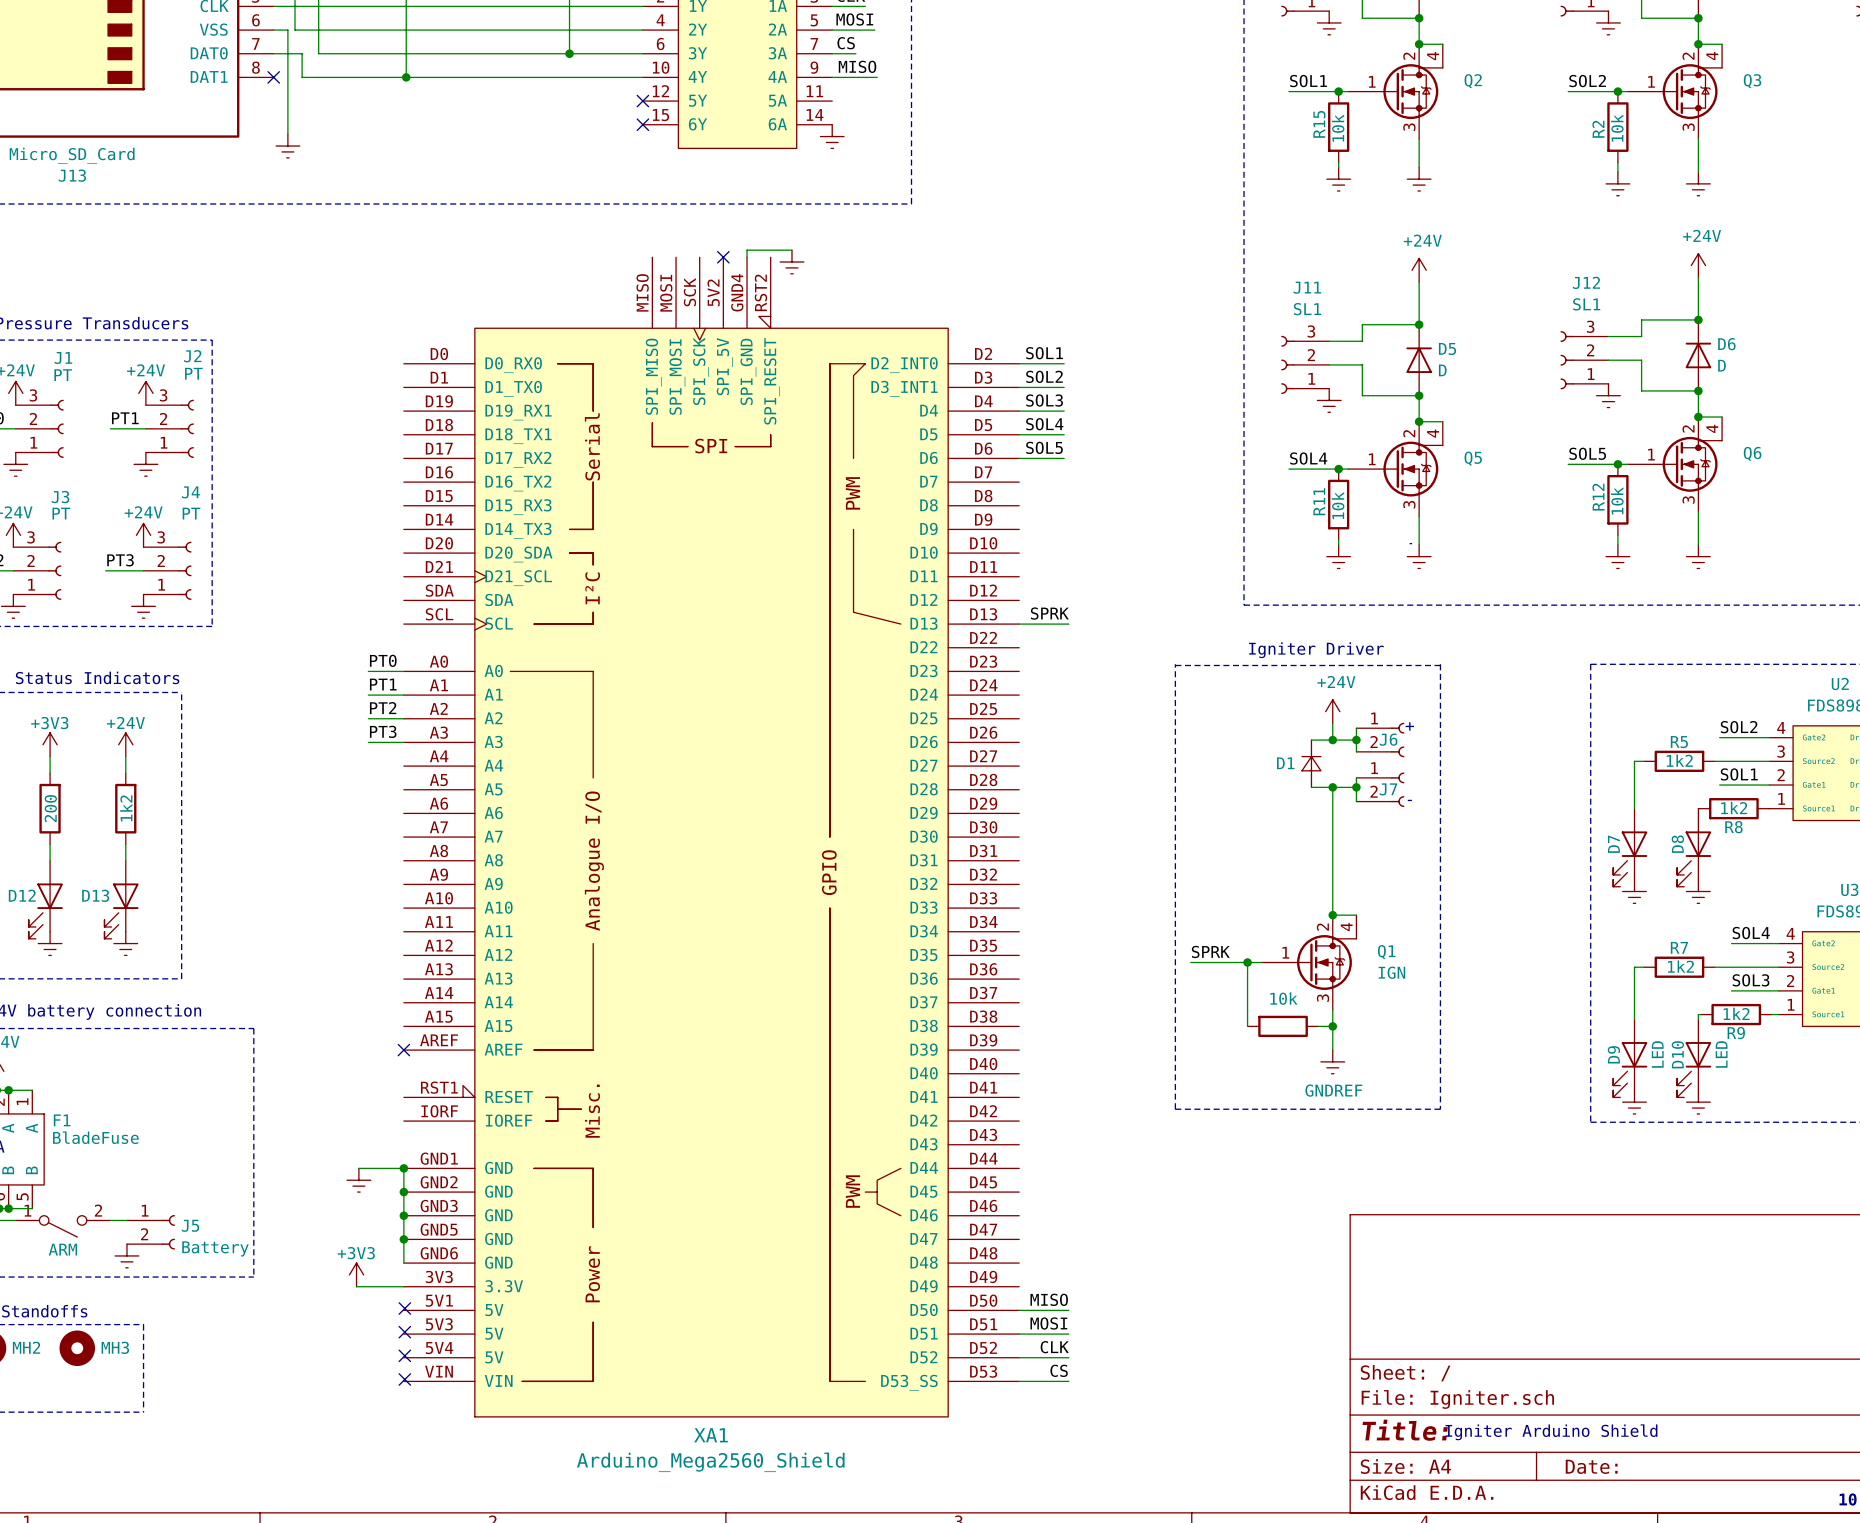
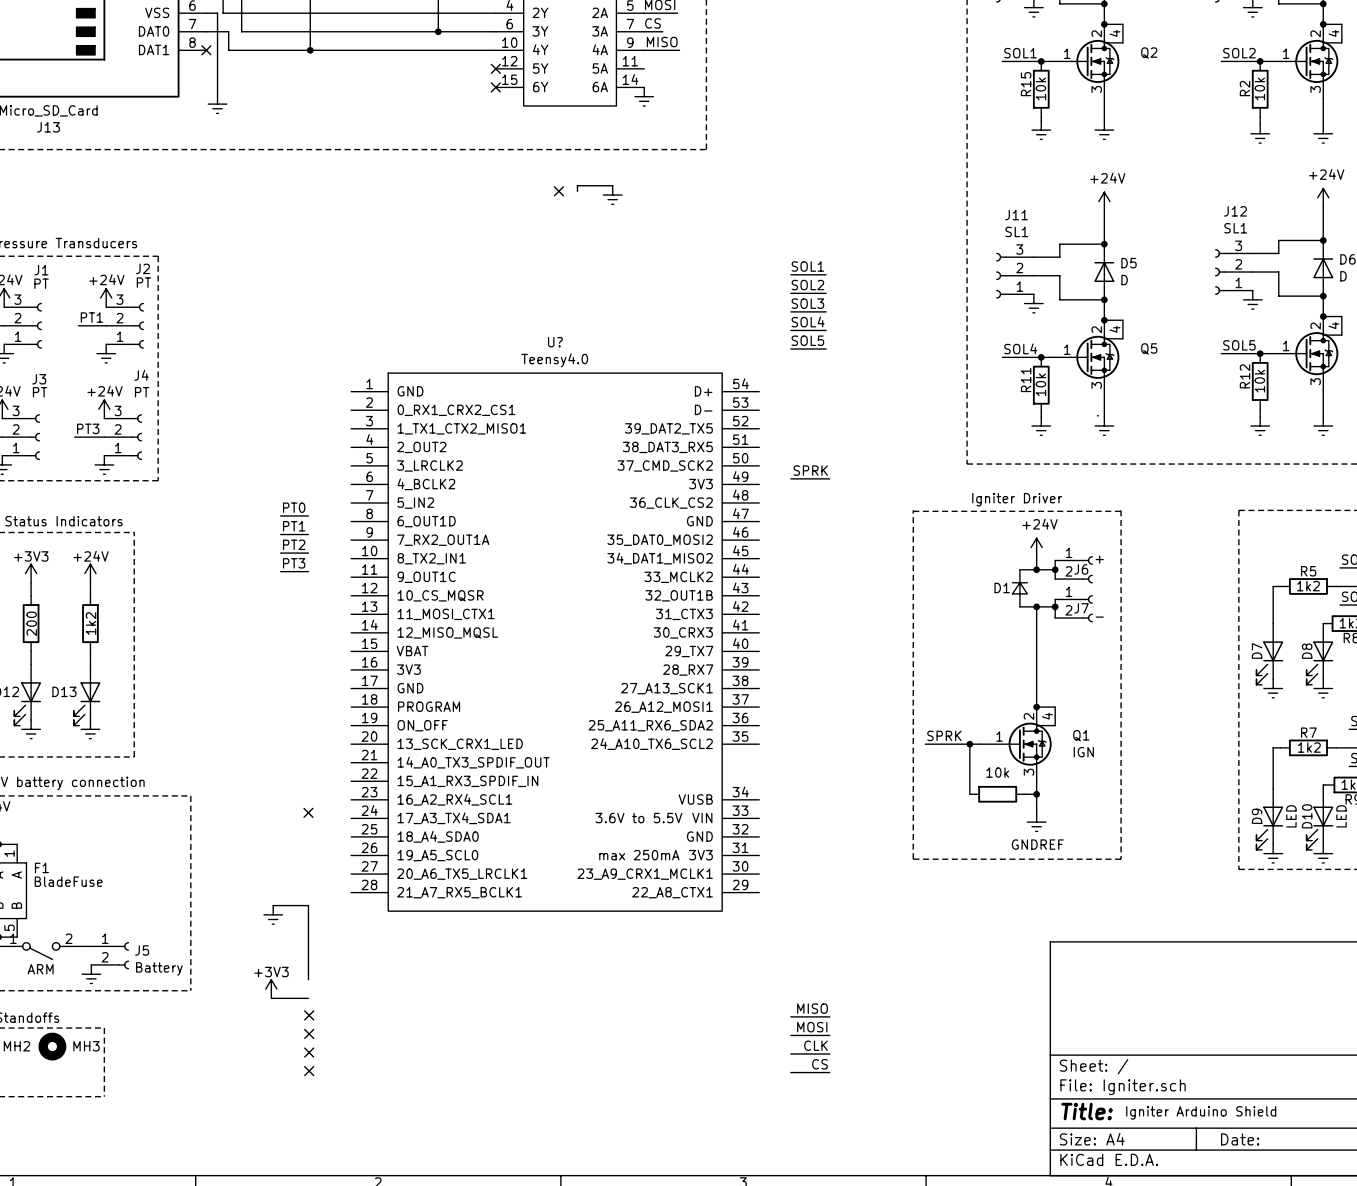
U?: none -> Teensy4.0 (555, 642)
XA1: Arduino_Mega2560_Shield (711, 837) -> none
junction: (403, 1168) -> none
junction: (403, 1192) -> none
junction: (403, 1215) -> none
junction: (403, 1239) -> none

